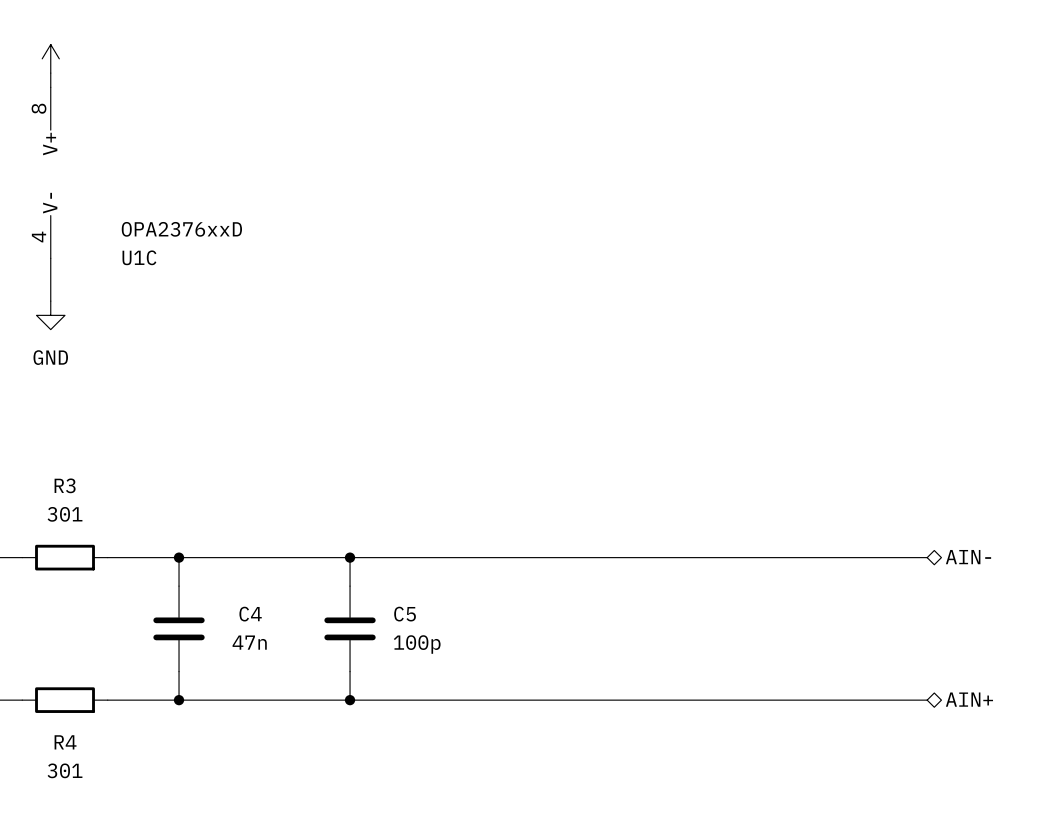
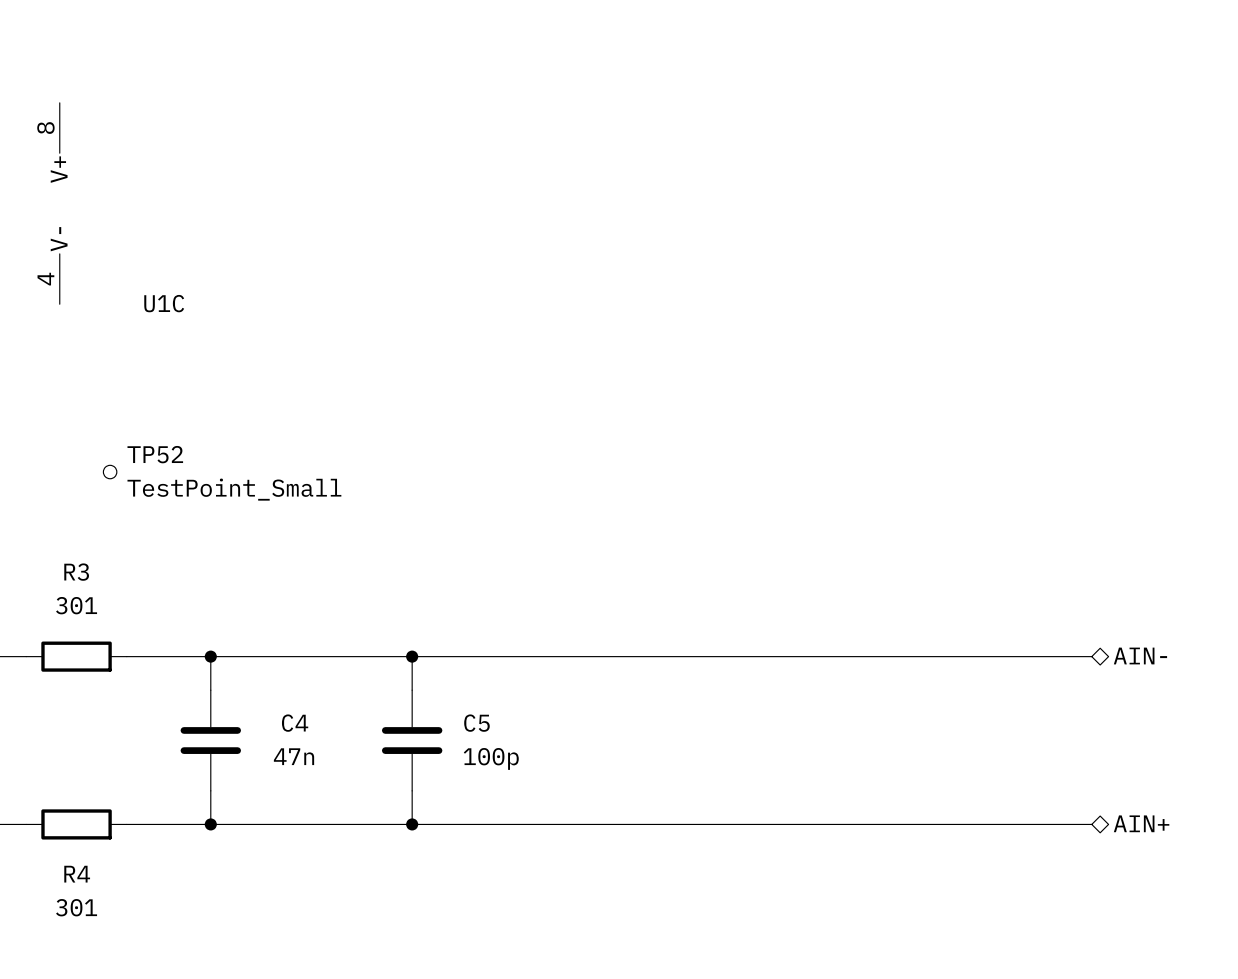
power symbol: (50, 58) -> none
wire: (50, 73) (50, 87) -> none
U1C value: OPA2376xxD (181, 229) -> none
wire: (50, 258) (50, 301) -> none
power symbol: GND (50, 315) -> none
TP52: none -> TestPoint_Small (110, 472)

